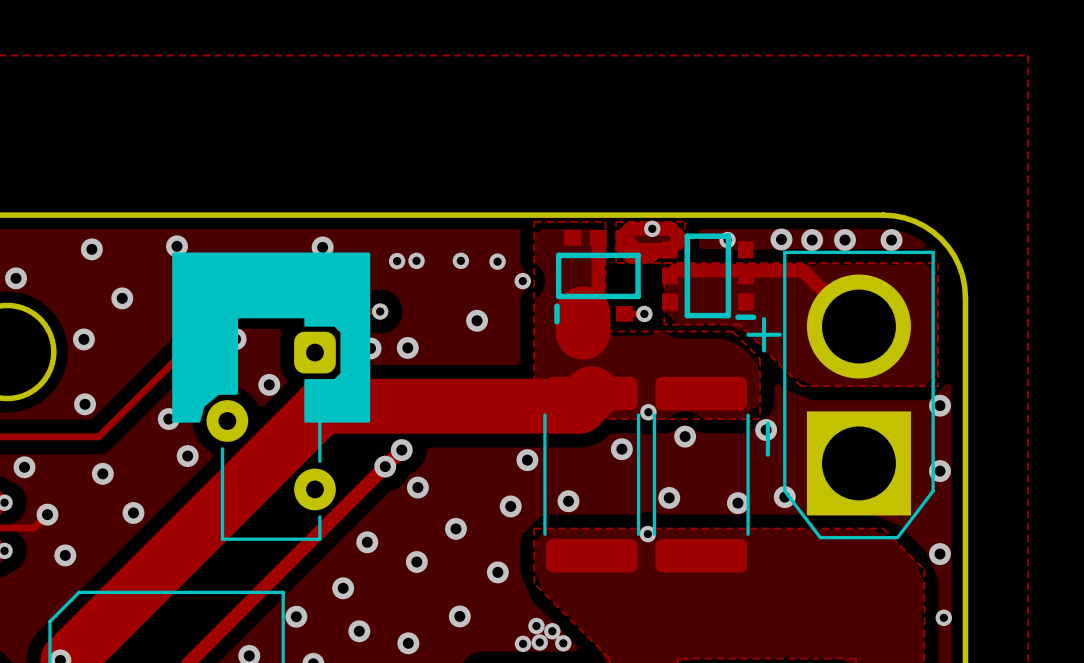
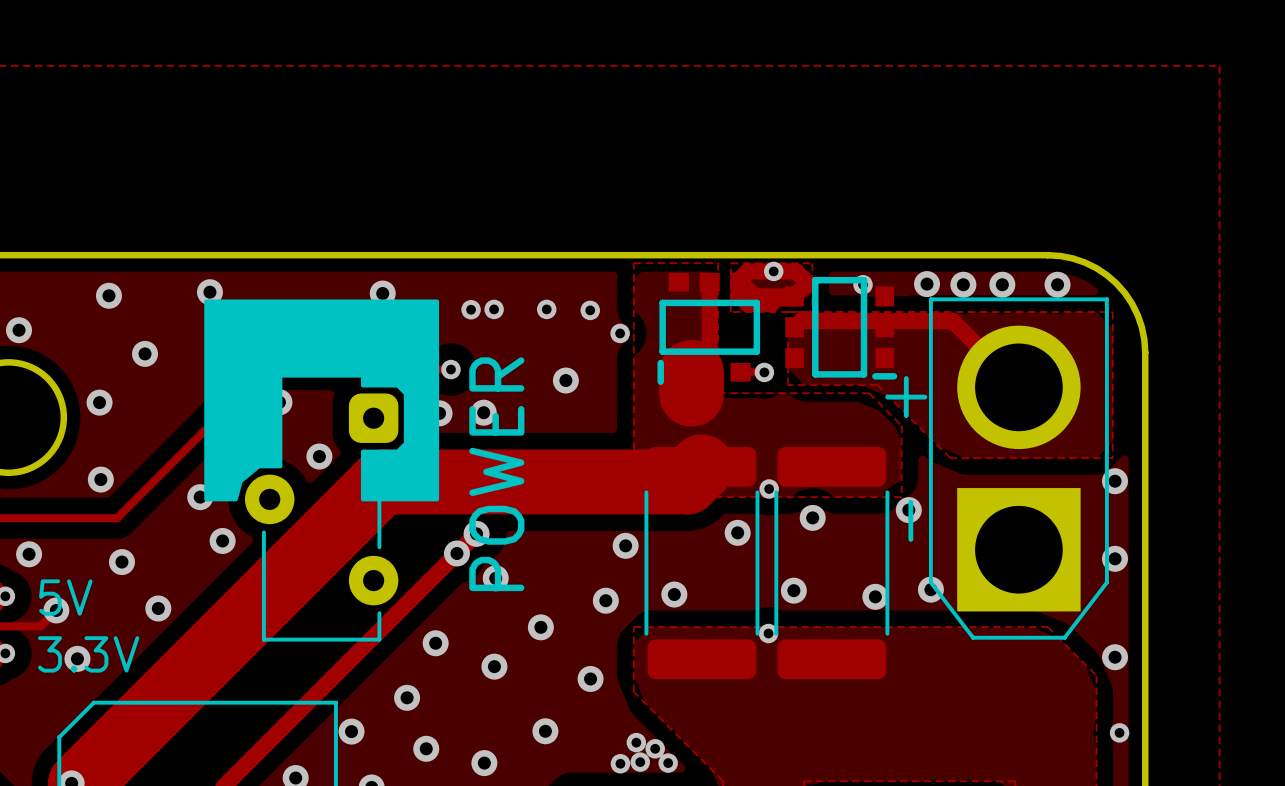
text: none -> POWER (496, 474)
text: none -> 5V (65, 597)
text: none -> 3.3V (88, 654)

